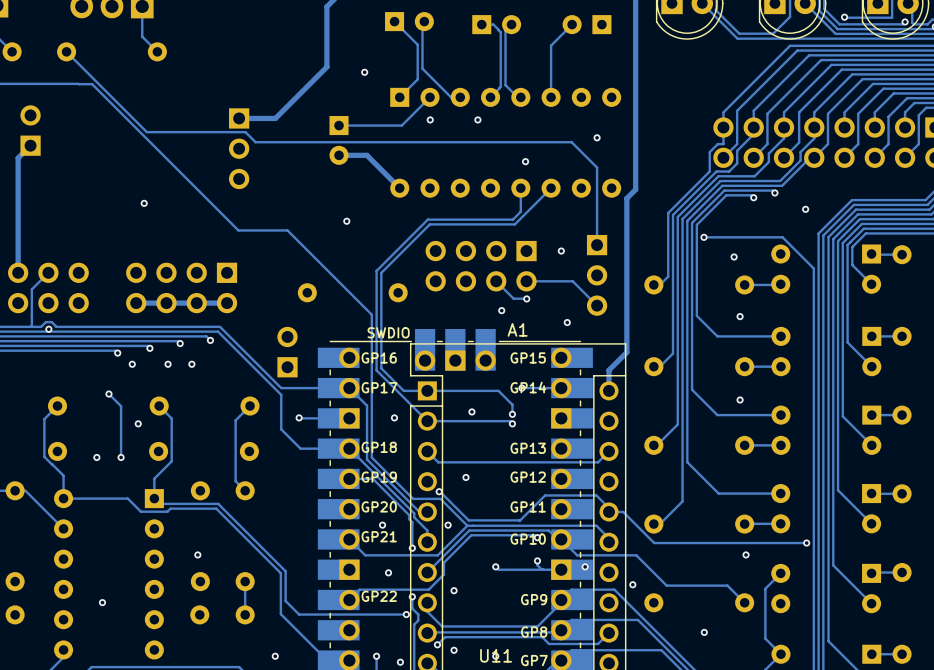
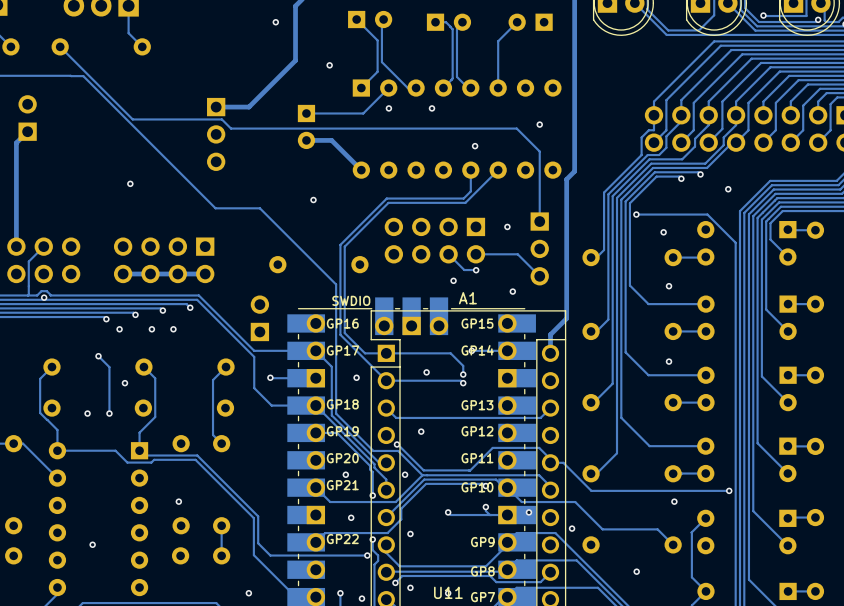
via: none -> (275, 22)

